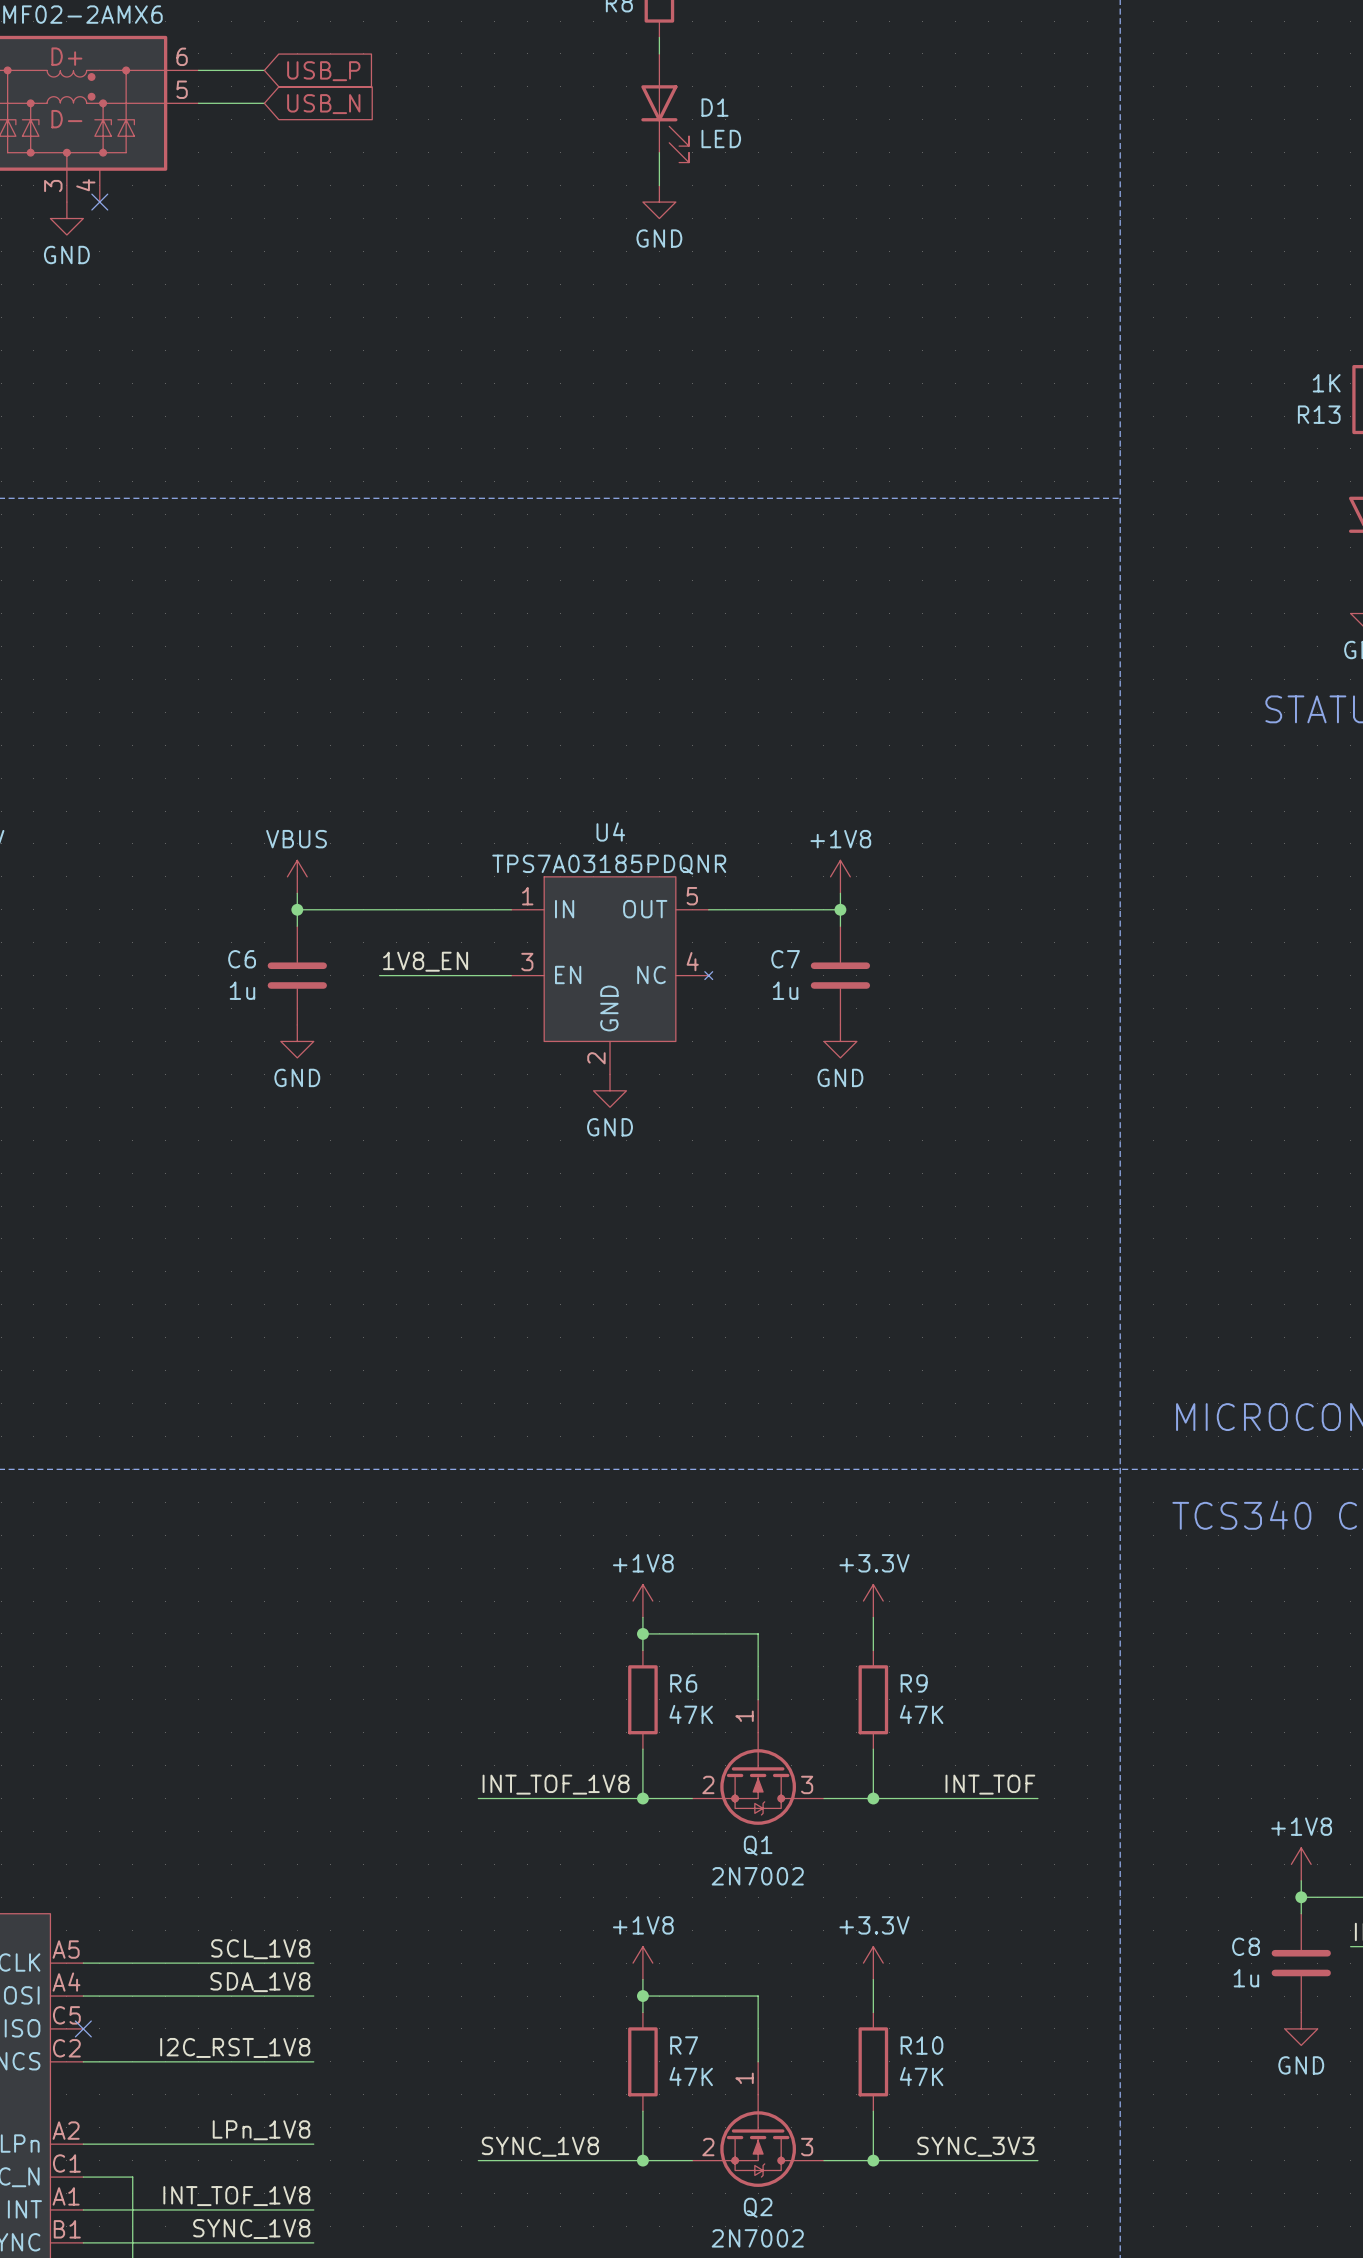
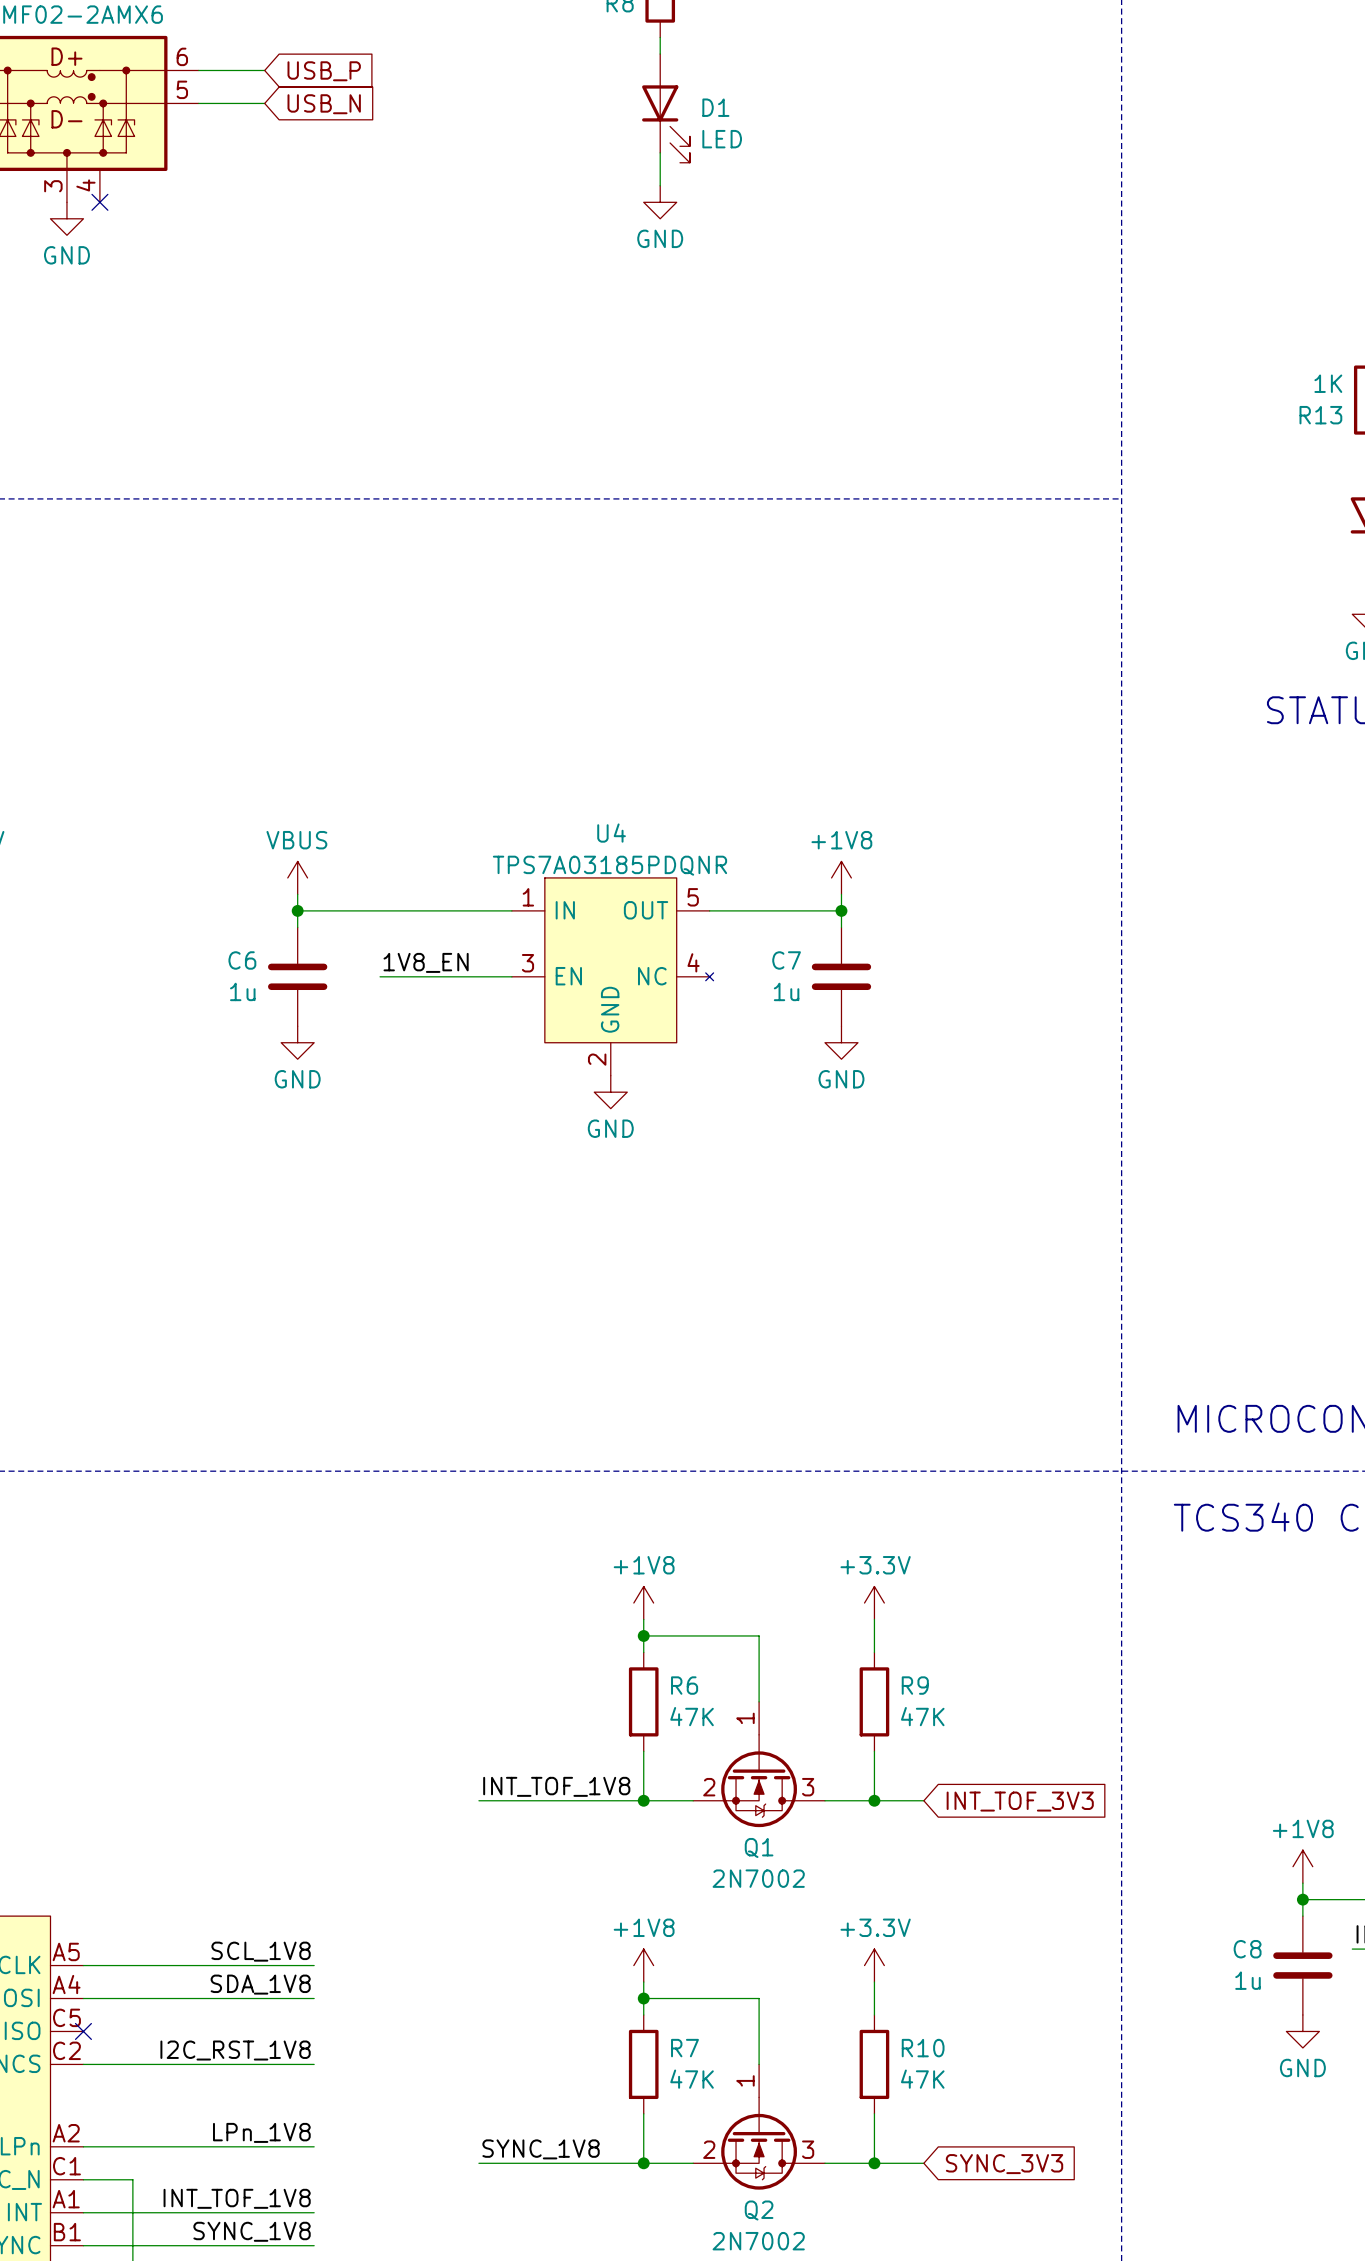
label: INT_TOF (990, 1784) -> none
wire: (922, 1798) (1037, 1798) -> none
global label: none -> INT_TOF_3V3 (1020, 1801)
label: SYNC_3V3 (975, 2146) -> none
wire: (922, 2160) (1037, 2160) -> none
global label: none -> SYNC_3V3 (1004, 2164)

